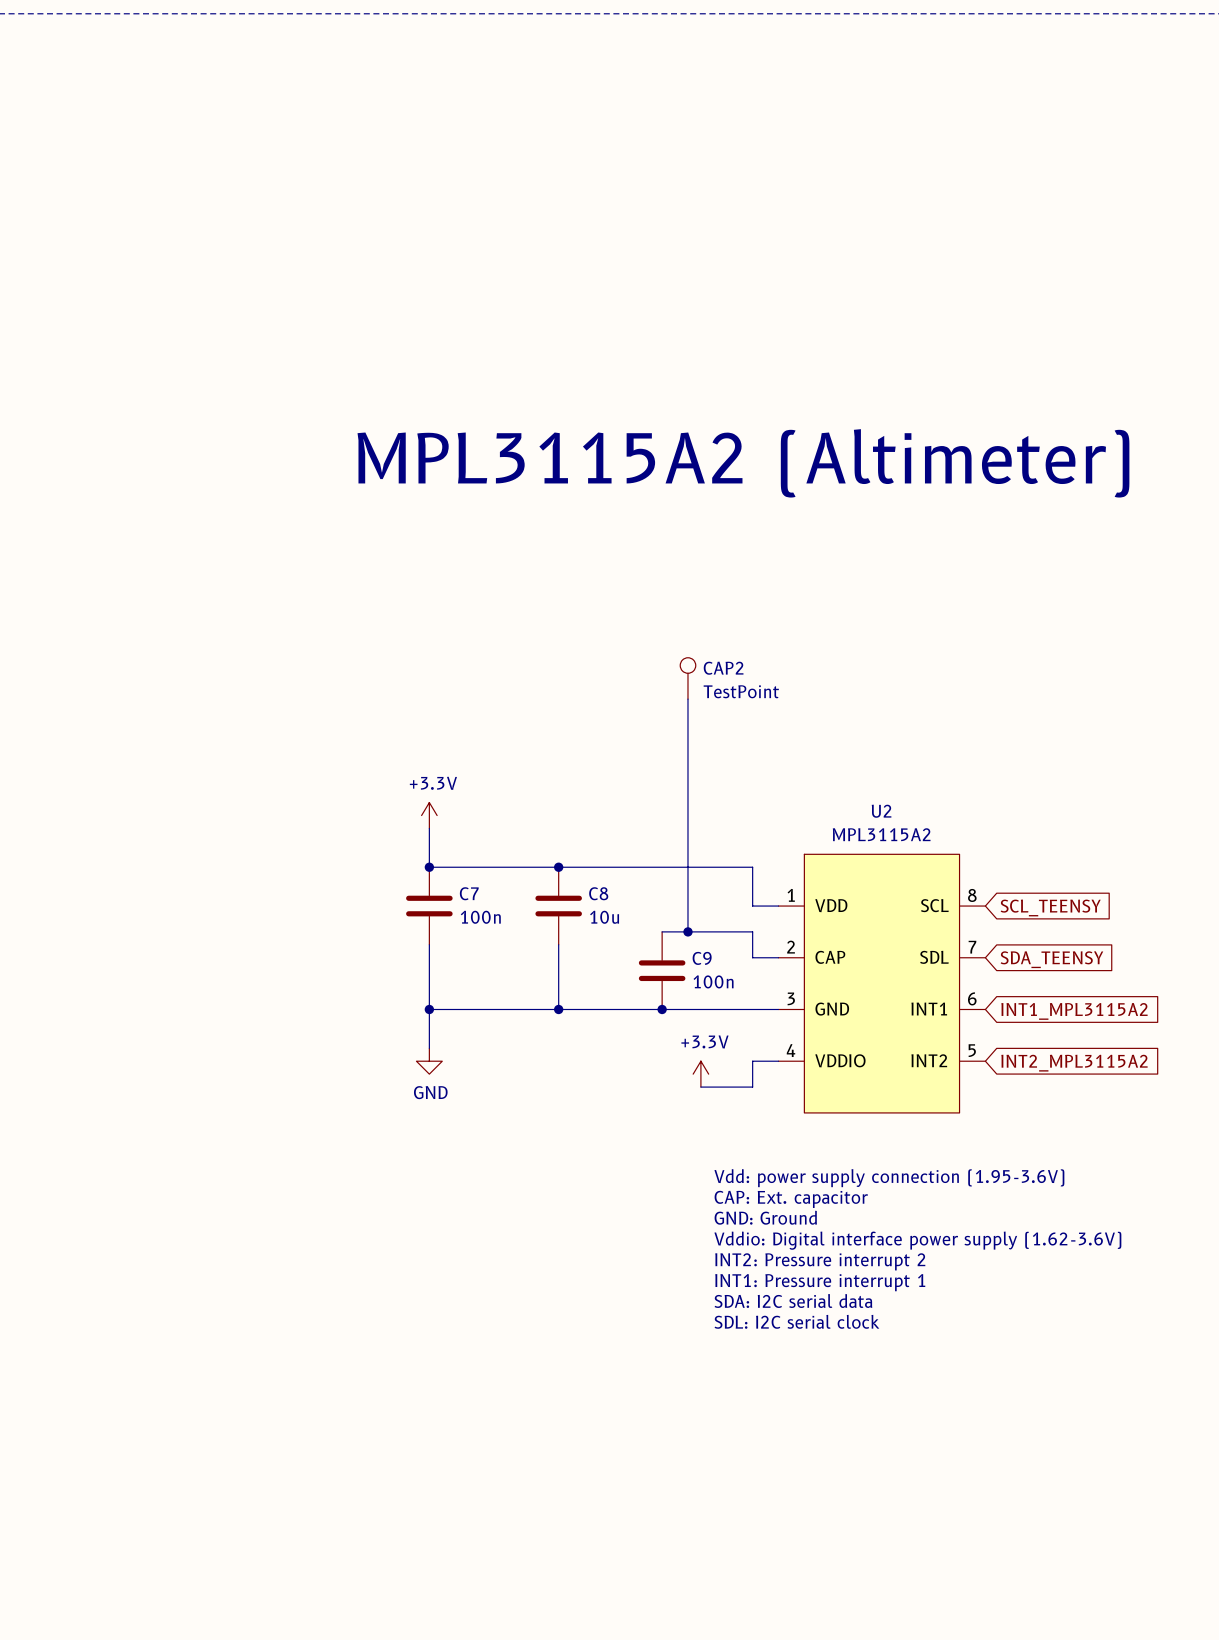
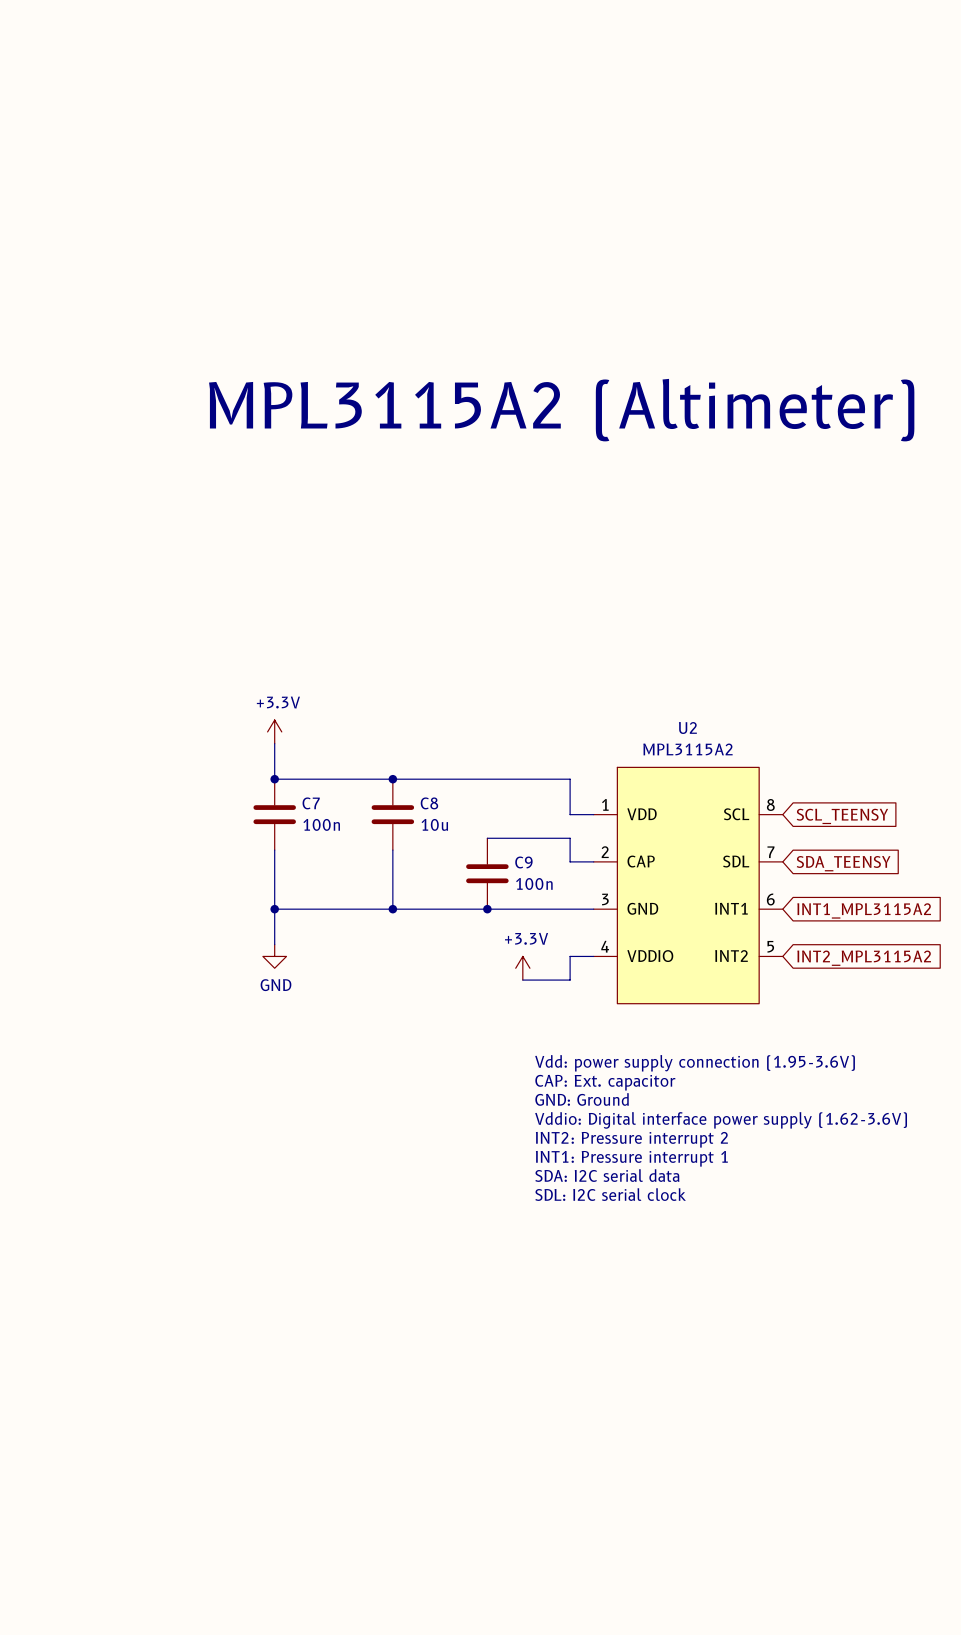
CAP2: TestPoint (687, 678) -> none
wire: (687, 699) (687, 931) -> none
junction: (687, 931) -> none

